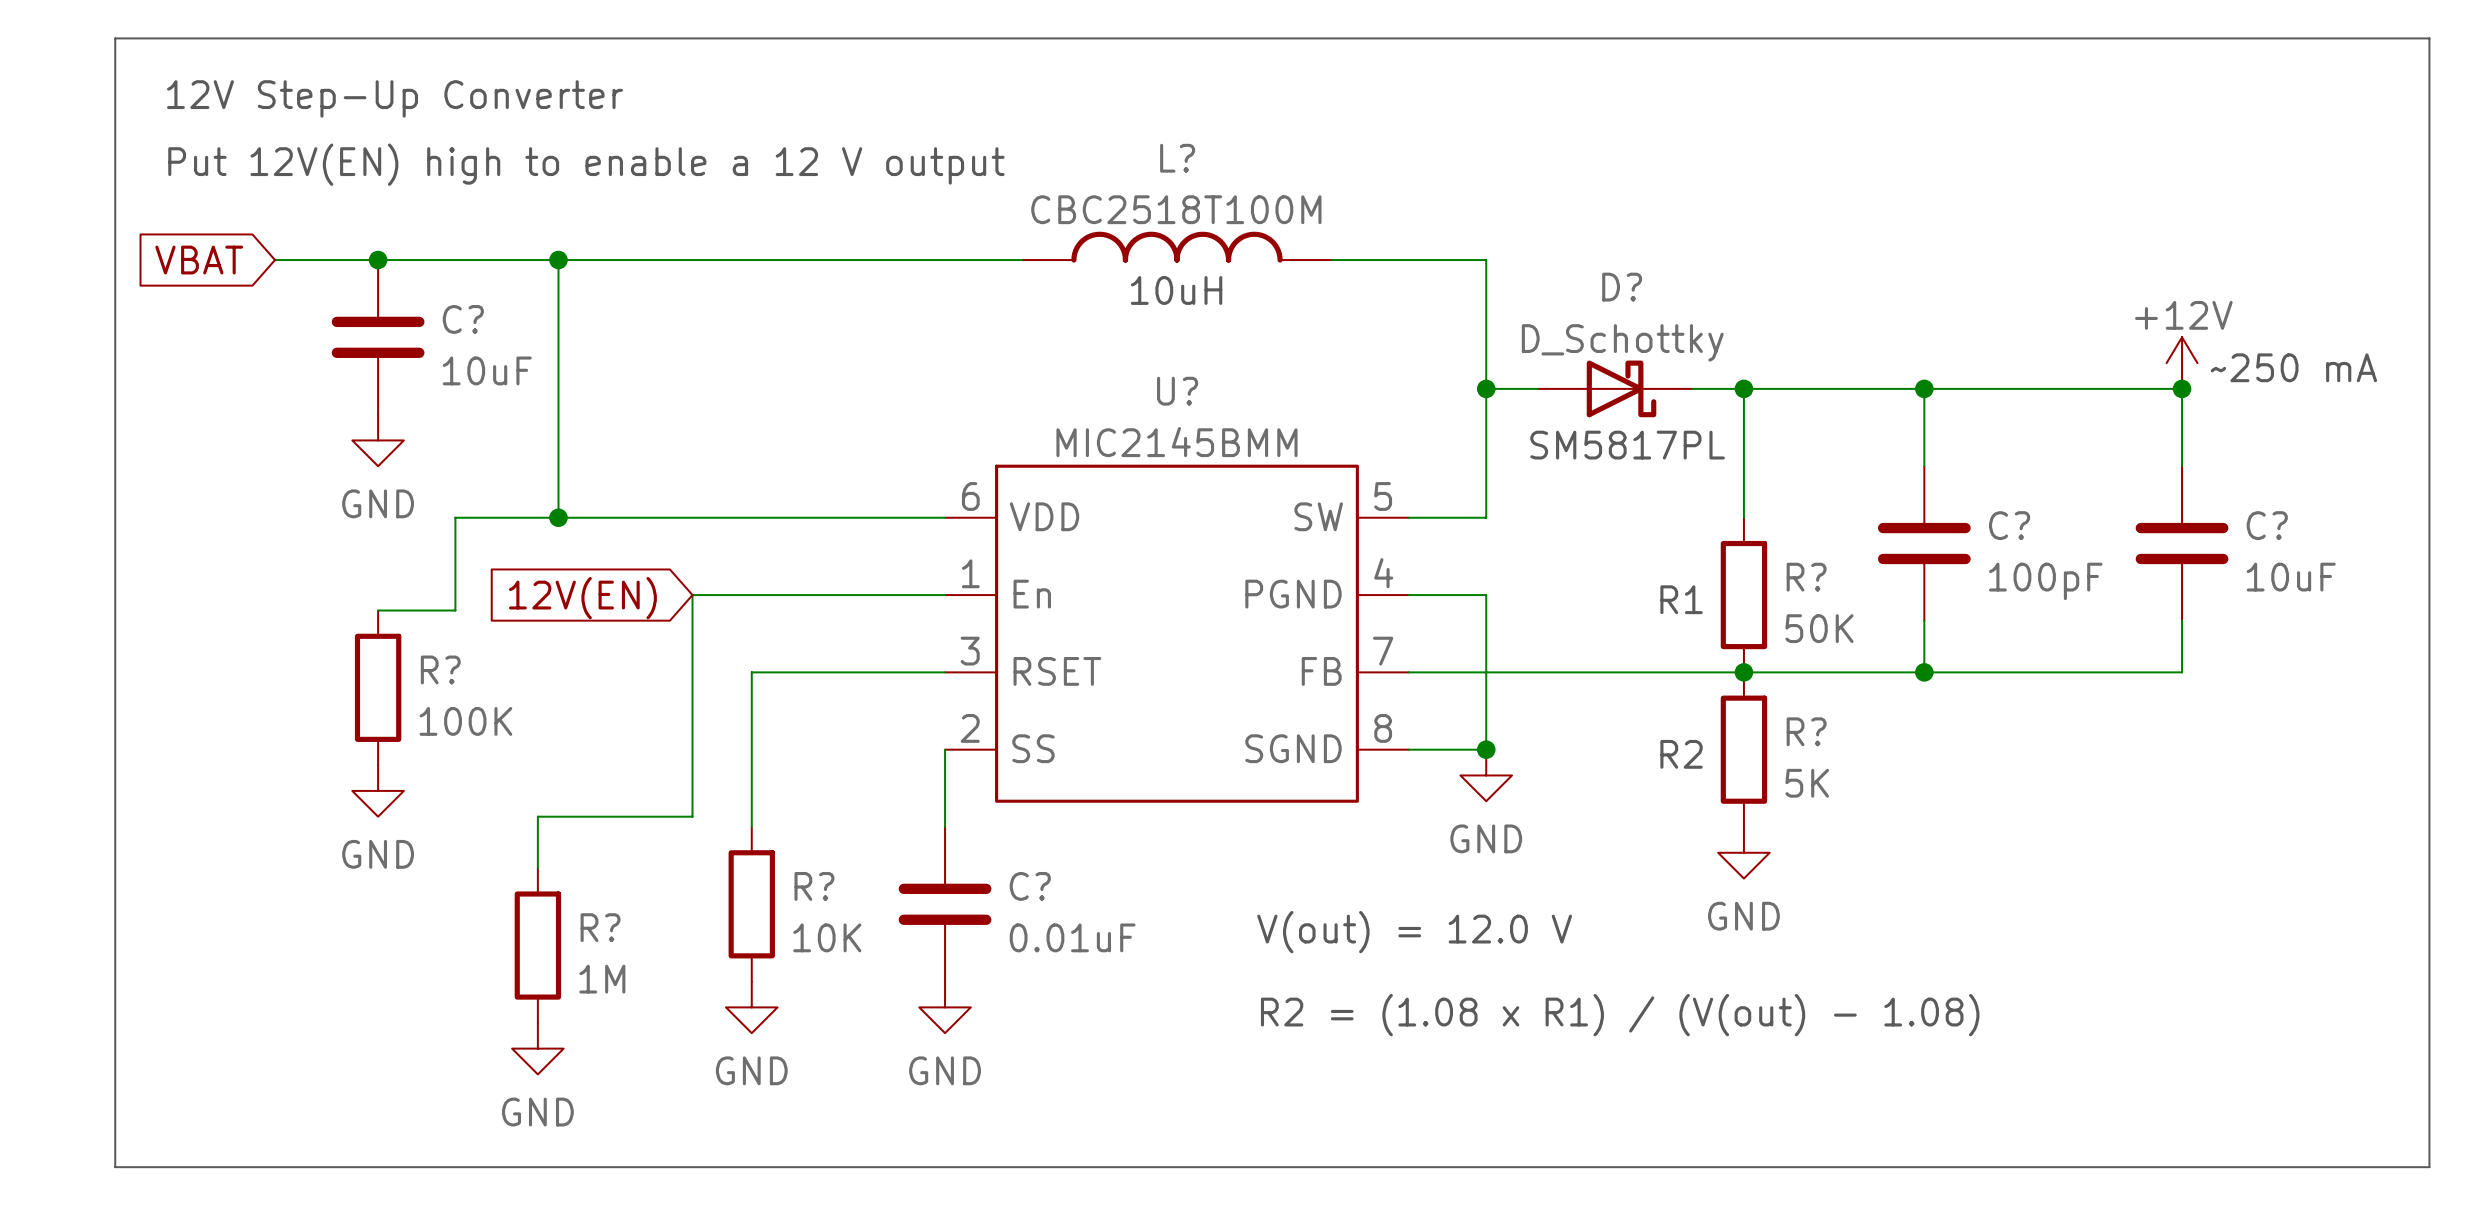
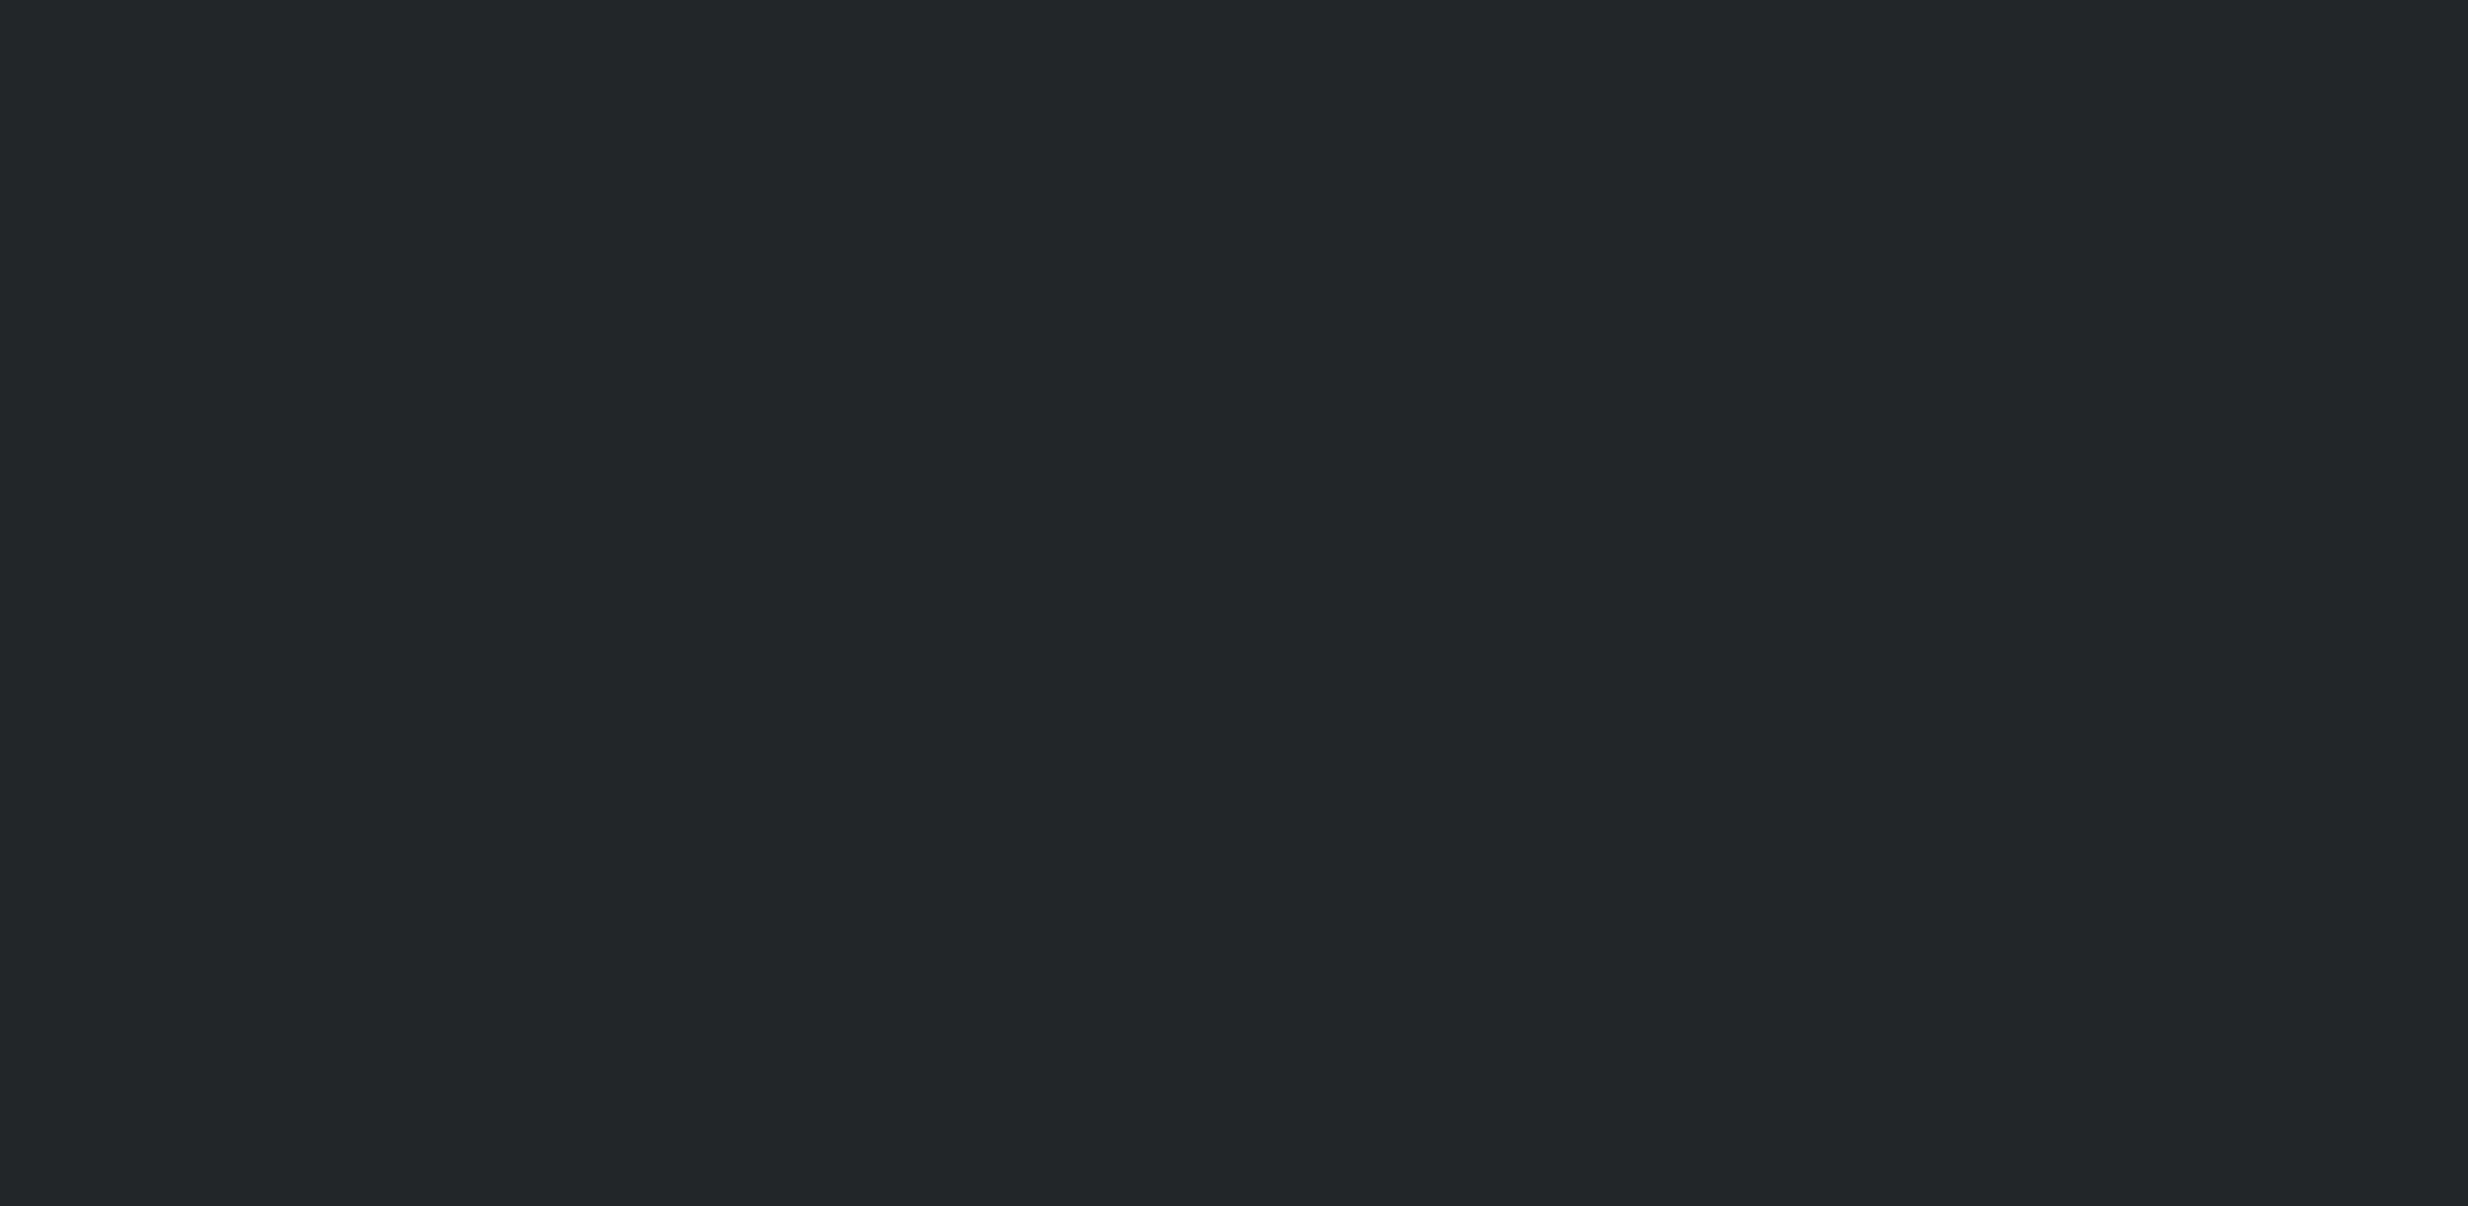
line: (115, 38) (2429, 38) (2429, 1167) (115, 1167) (115, 38) -> none
text: 12V Step-Up Converter (394, 98) -> none
text: Put 12V(EN) high to enable a 12 V output (586, 164) -> none
L?: CBC2518T100M (1176, 247) -> none
global label: VBAT (199, 260) -> none
wire: (275, 260) (1022, 260) -> none
junction: (378, 260) -> none
wire: (558, 260) (558, 517) -> none
junction: (558, 260) -> none
wire: (1331, 260) (1486, 260) (1486, 517) (1408, 517) -> none
text: 10uH (1176, 290) -> none
C?: 10uF (378, 337) -> none
power symbol: +12V (2182, 363) -> none
text: ~250 mA (2293, 367) -> none
wire: (1486, 388) (1537, 388) -> none
junction: (1486, 388) -> none
D?: D_Schottky (1615, 388) -> none
wire: (1692, 388) (2182, 388) (2182, 466) -> none
wire: (1743, 388) (1743, 517) -> none
junction: (1743, 388) -> none
wire: (1924, 388) (1924, 466) -> none
junction: (1924, 388) -> none
junction: (2182, 388) -> none
power symbol: GND (378, 440) -> none
text: SM5817PL (1627, 445) -> none
junction: (558, 517) -> none
wire: (945, 517) (455, 517) (455, 610) (378, 610) -> none
C?: 100pF (1924, 543) -> none
C?: 10uF (2182, 543) -> none
wire: (945, 595) (692, 595) (692, 816) (537, 816) (537, 868) -> none
wire: (1408, 595) (1486, 595) (1486, 749) (1408, 749) -> none
R?: 50K (1743, 595) -> none
global label: 12V(EN) (582, 598) -> none
text: R1 (1681, 599) -> none
wire: (1924, 620) (1924, 672) -> none
wire: (2182, 620) (2182, 672) (1408, 672) -> none
U?: MIC2145BMM (1176, 633) -> none
wire: (945, 672) (751, 672) (751, 827) -> none
junction: (1743, 672) -> none
junction: (1924, 672) -> none
R?: 100K (378, 687) -> none
wire: (945, 749) (945, 827) -> none
junction: (1486, 749) -> none
R?: 5K (1743, 749) -> none
text: R2 (1681, 754) -> none
power symbol: GND (1486, 775) -> none
power symbol: GND (378, 790) -> none
power symbol: GND (1743, 852) -> none
R?: 10K (751, 904) -> none
C?: 0.01uF (945, 904) -> none
text: V(out) = 12.0 V (1414, 932) -> none
R?: 1M (537, 945) -> none
power symbol: GND (751, 1007) -> none
power symbol: GND (945, 1007) -> none
text: R2 = (1.08 x R1) / (V(out) - 1.08) (1620, 1015) -> none
power symbol: GND (537, 1048) -> none

